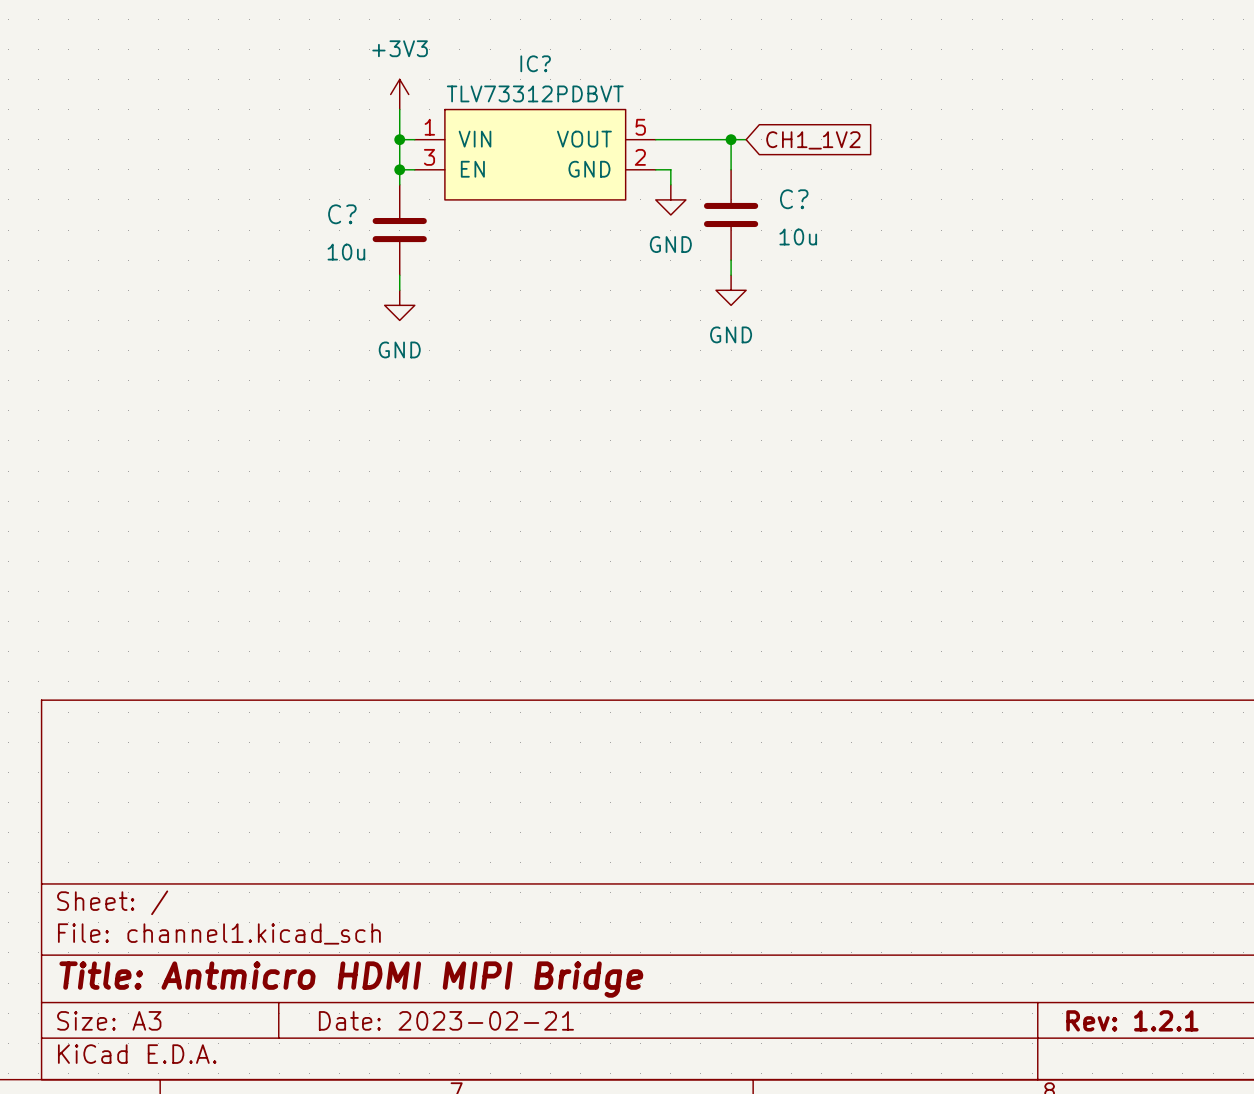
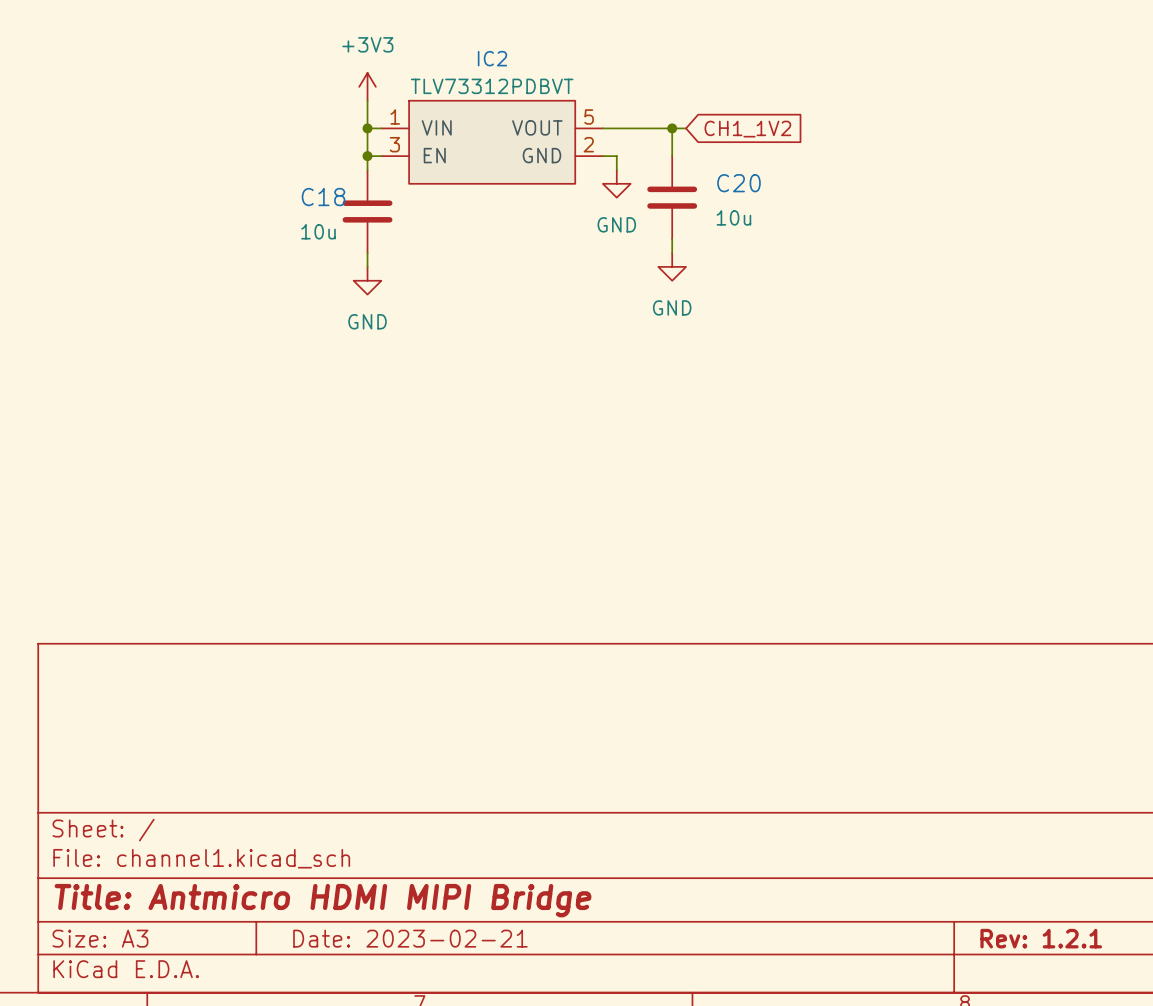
IC? name: IC? (535, 63) -> IC2 (492, 58)
C? name: C? (794, 199) -> C20 (738, 183)
C? name: C? (342, 214) -> C18 (323, 197)

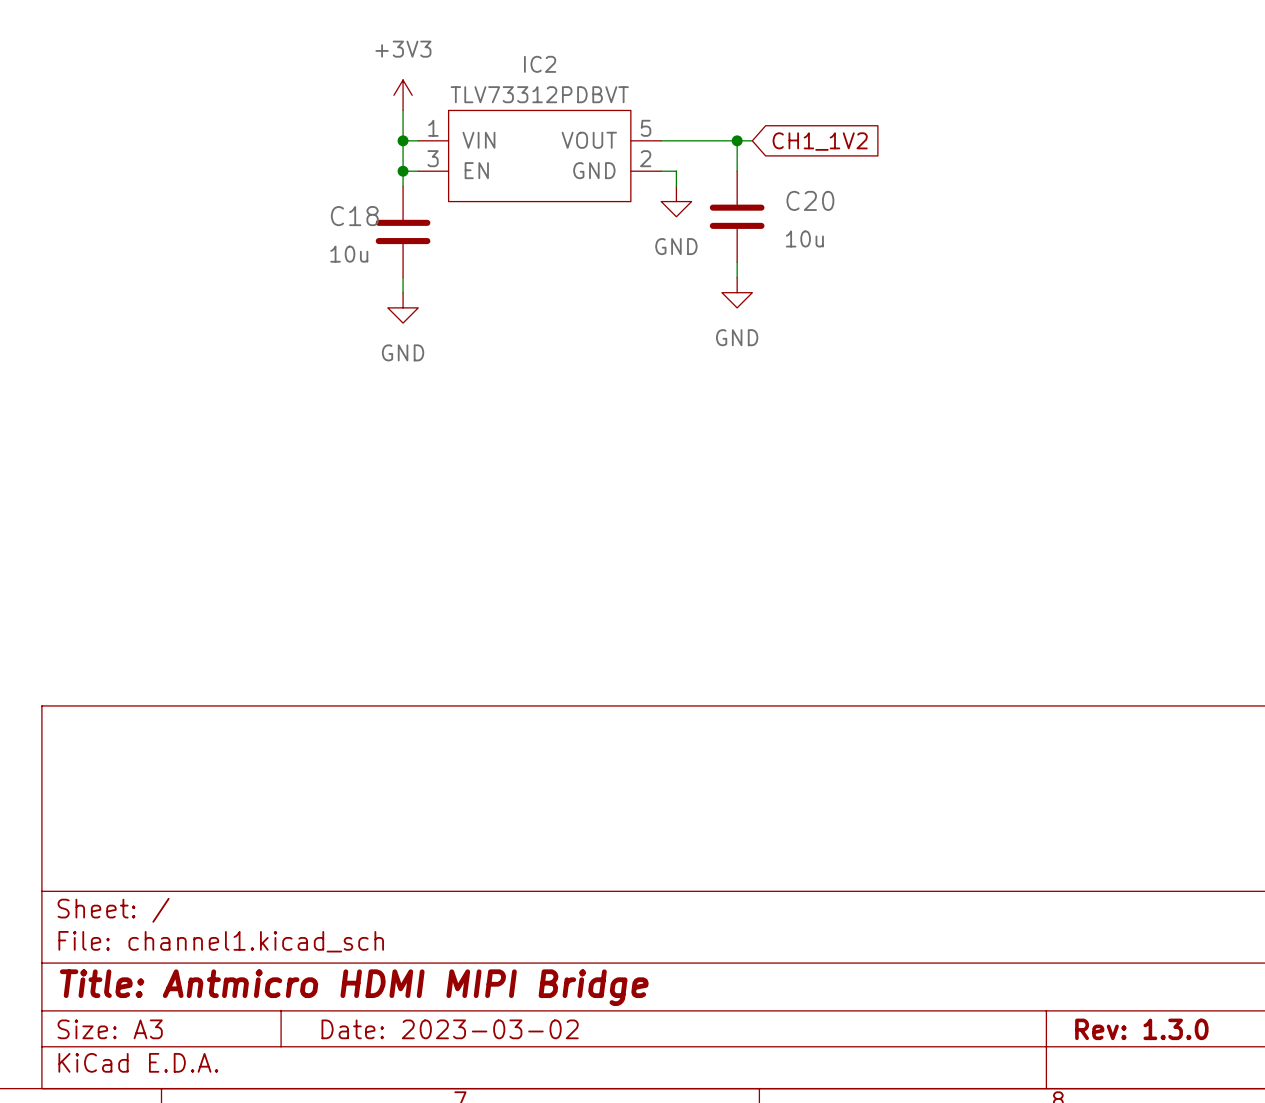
title block: Date: 2023-02-21 (410, 938) -> Date: 2023-03-02 (450, 1029)
title block: Rev: 1.2.1 (1041, 938) -> Rev: 1.3.0 (1141, 1029)

